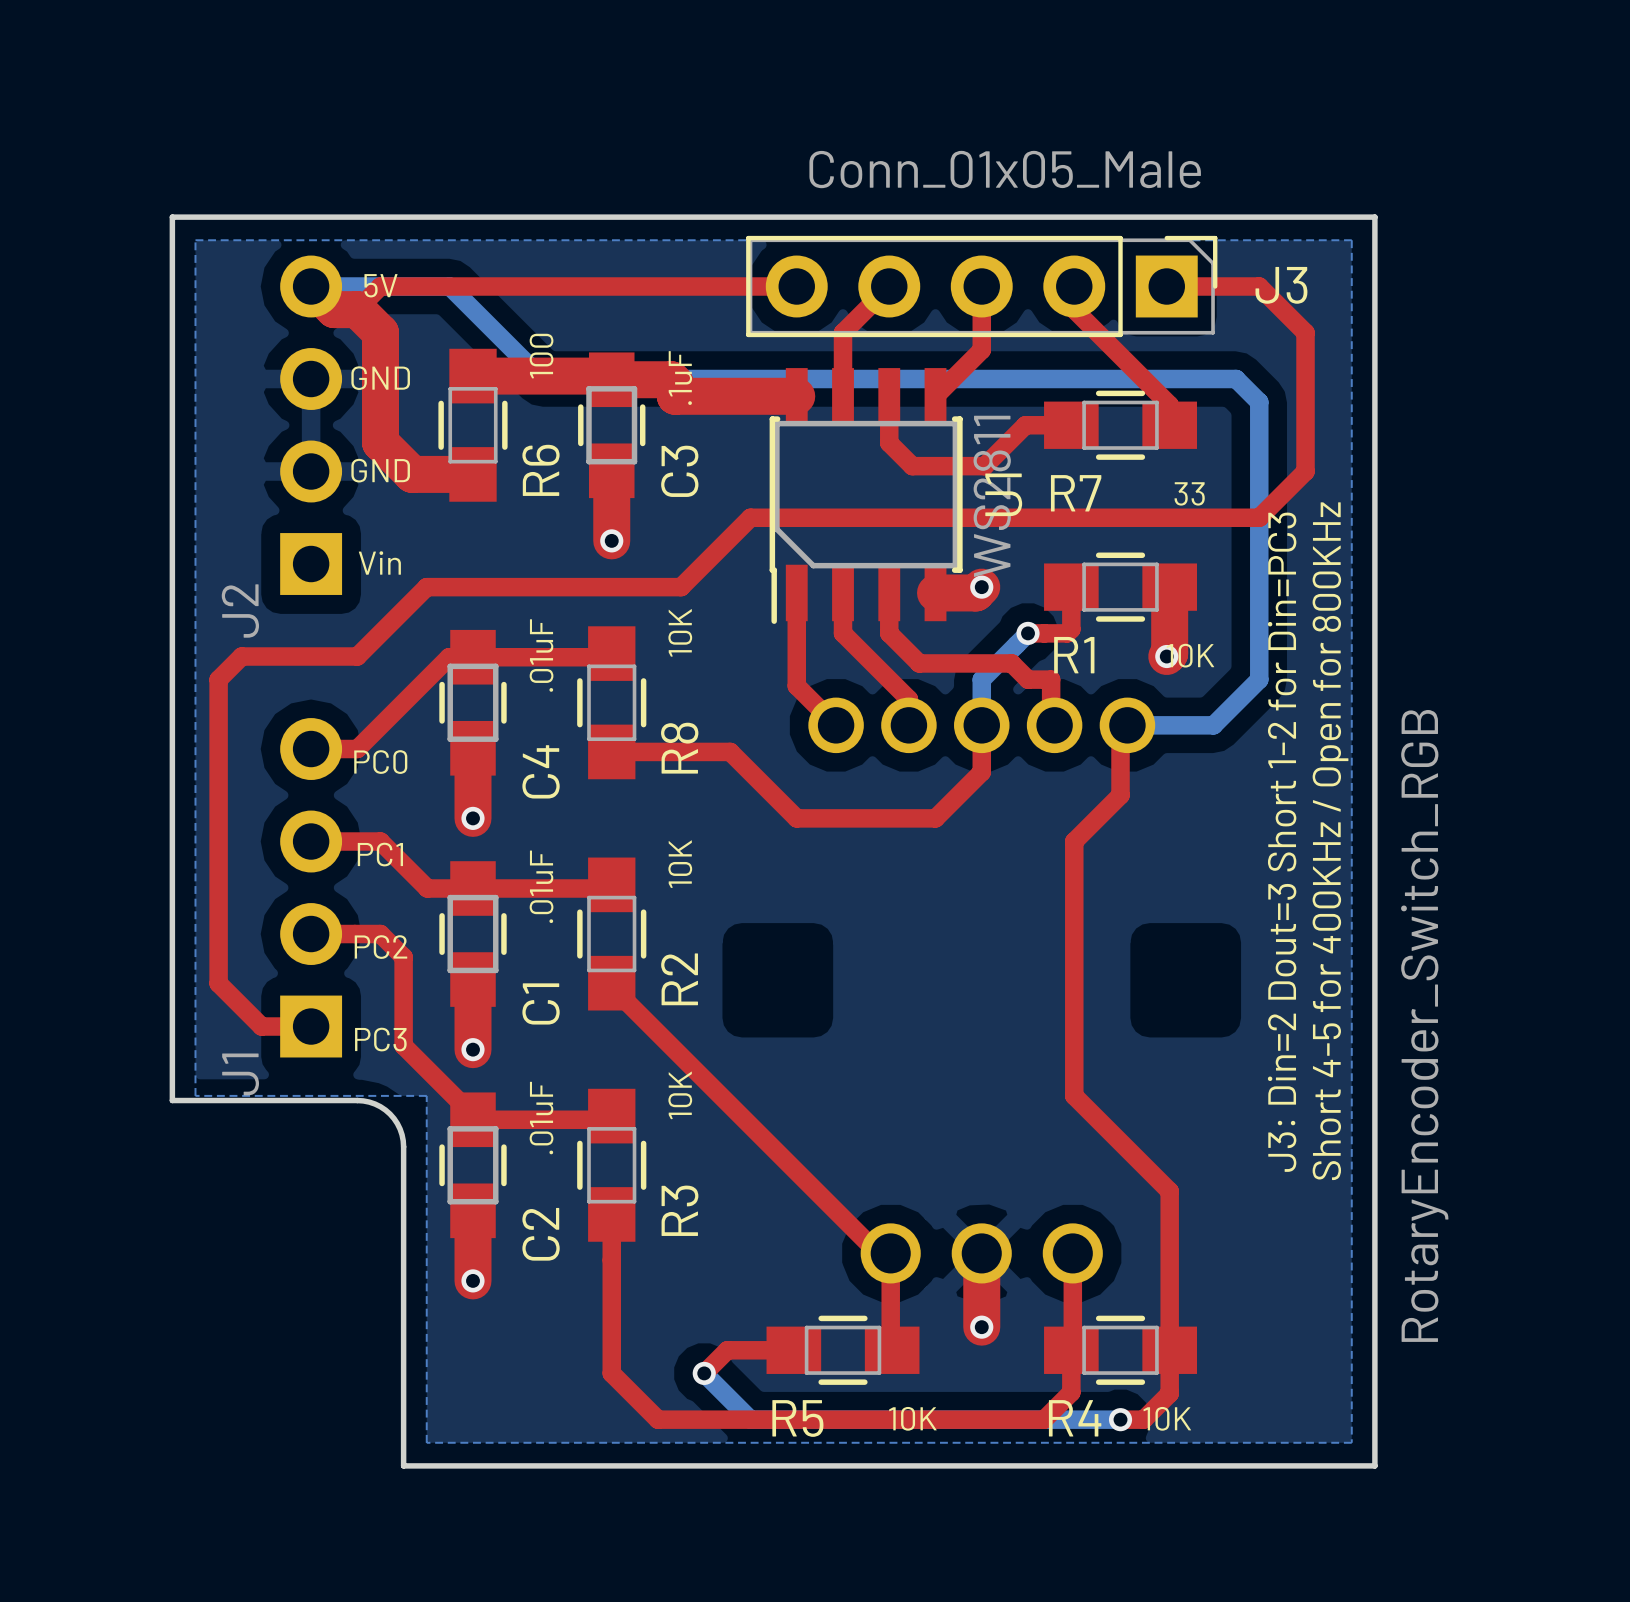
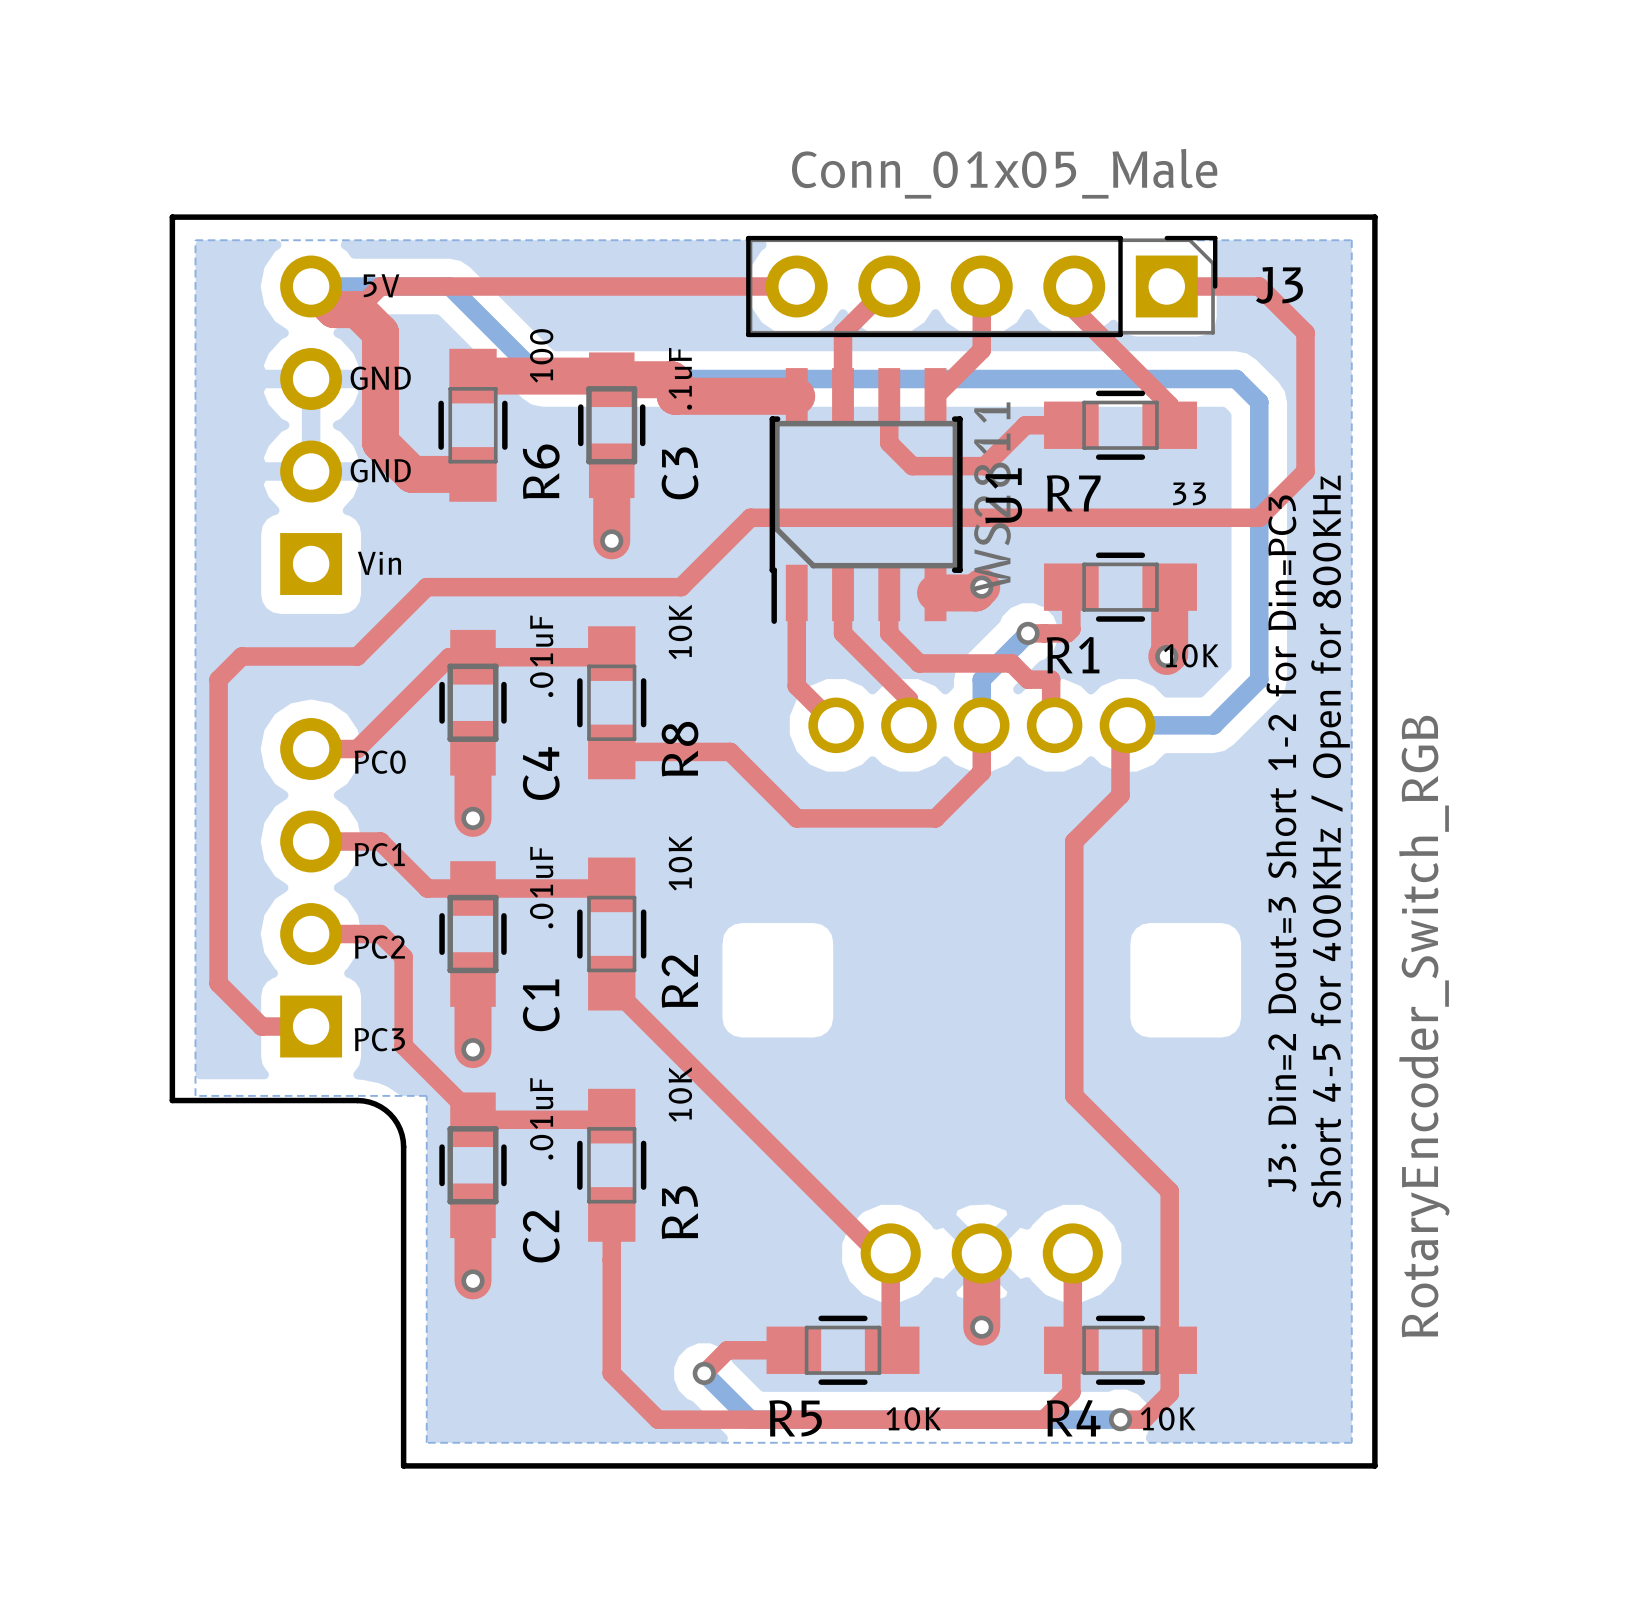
J2 name: J2 (240, 611) -> none
J1 name: J1 (240, 1074) -> none

